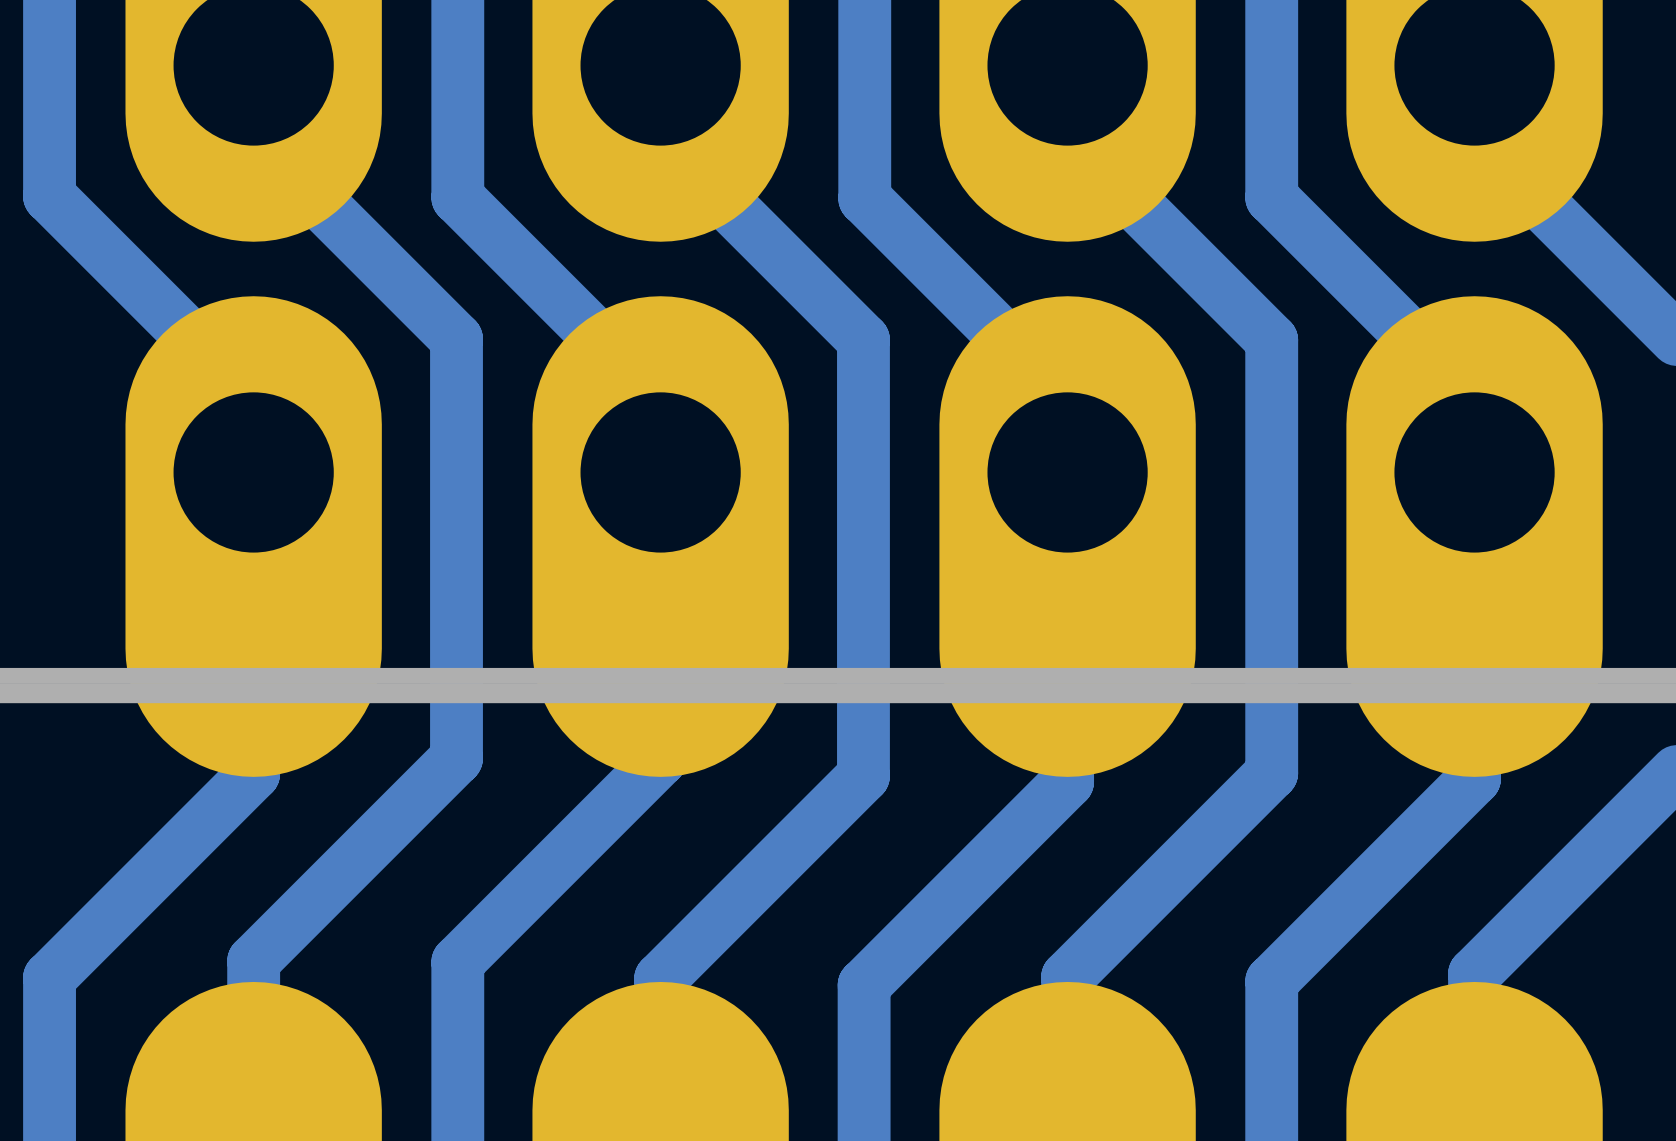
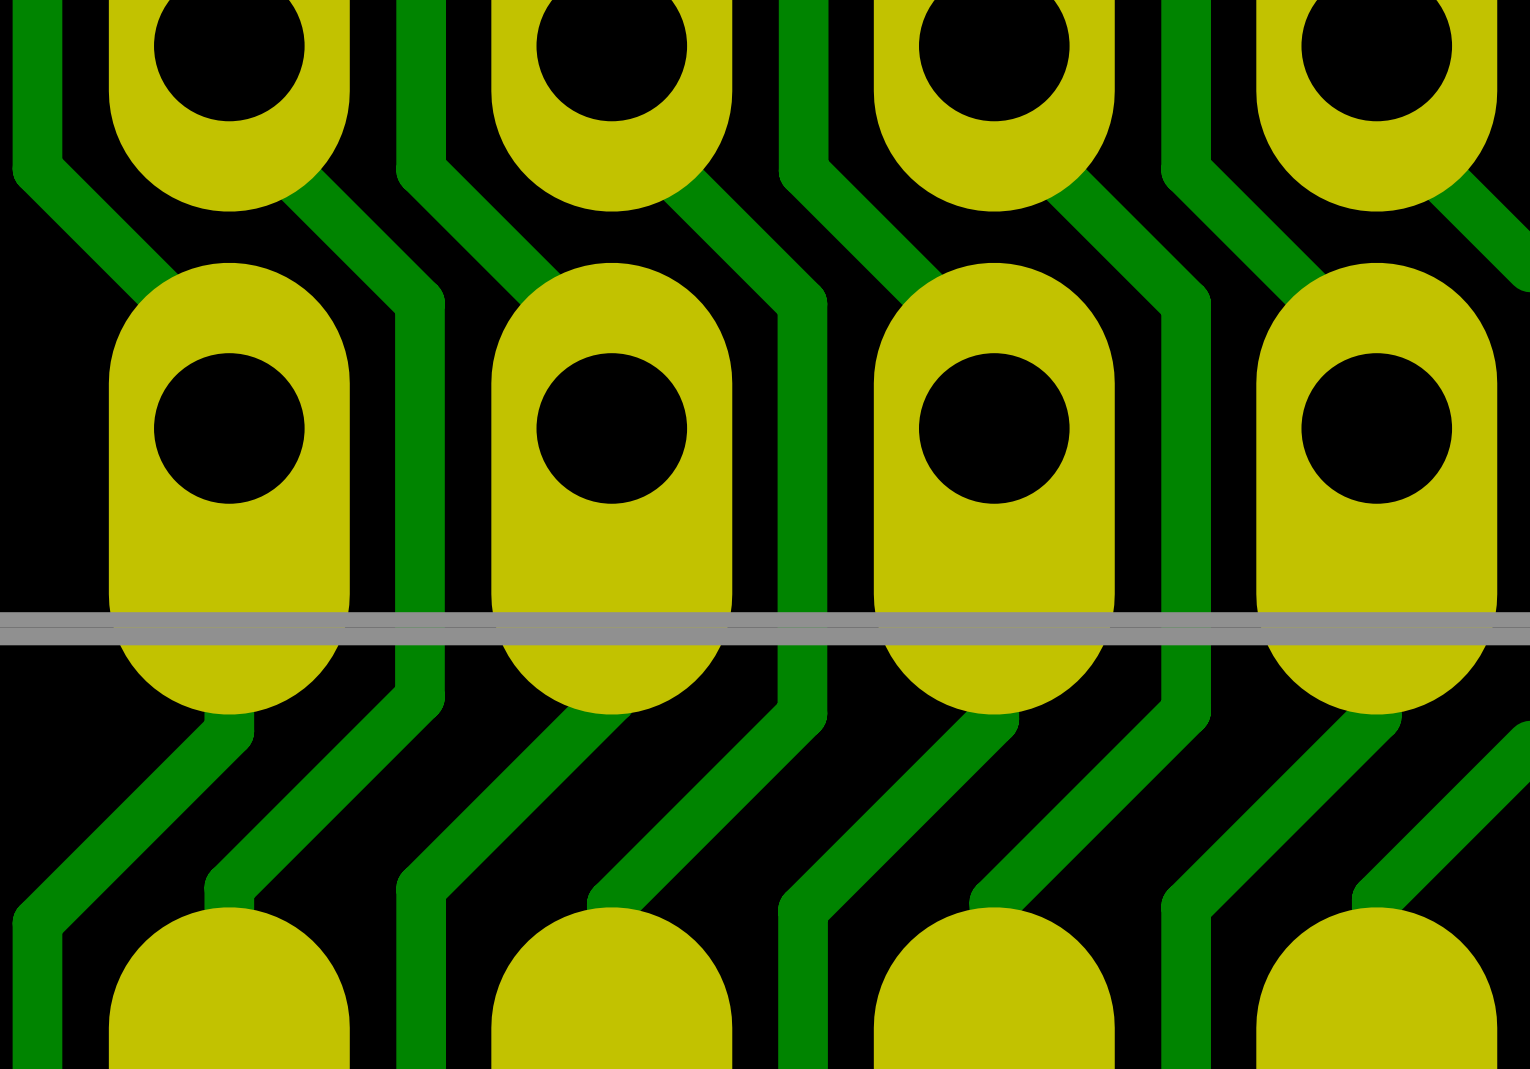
track: (253, 773) (49, 977) (49, 998) -> (229, 711) (229, 731) (37, 923)

